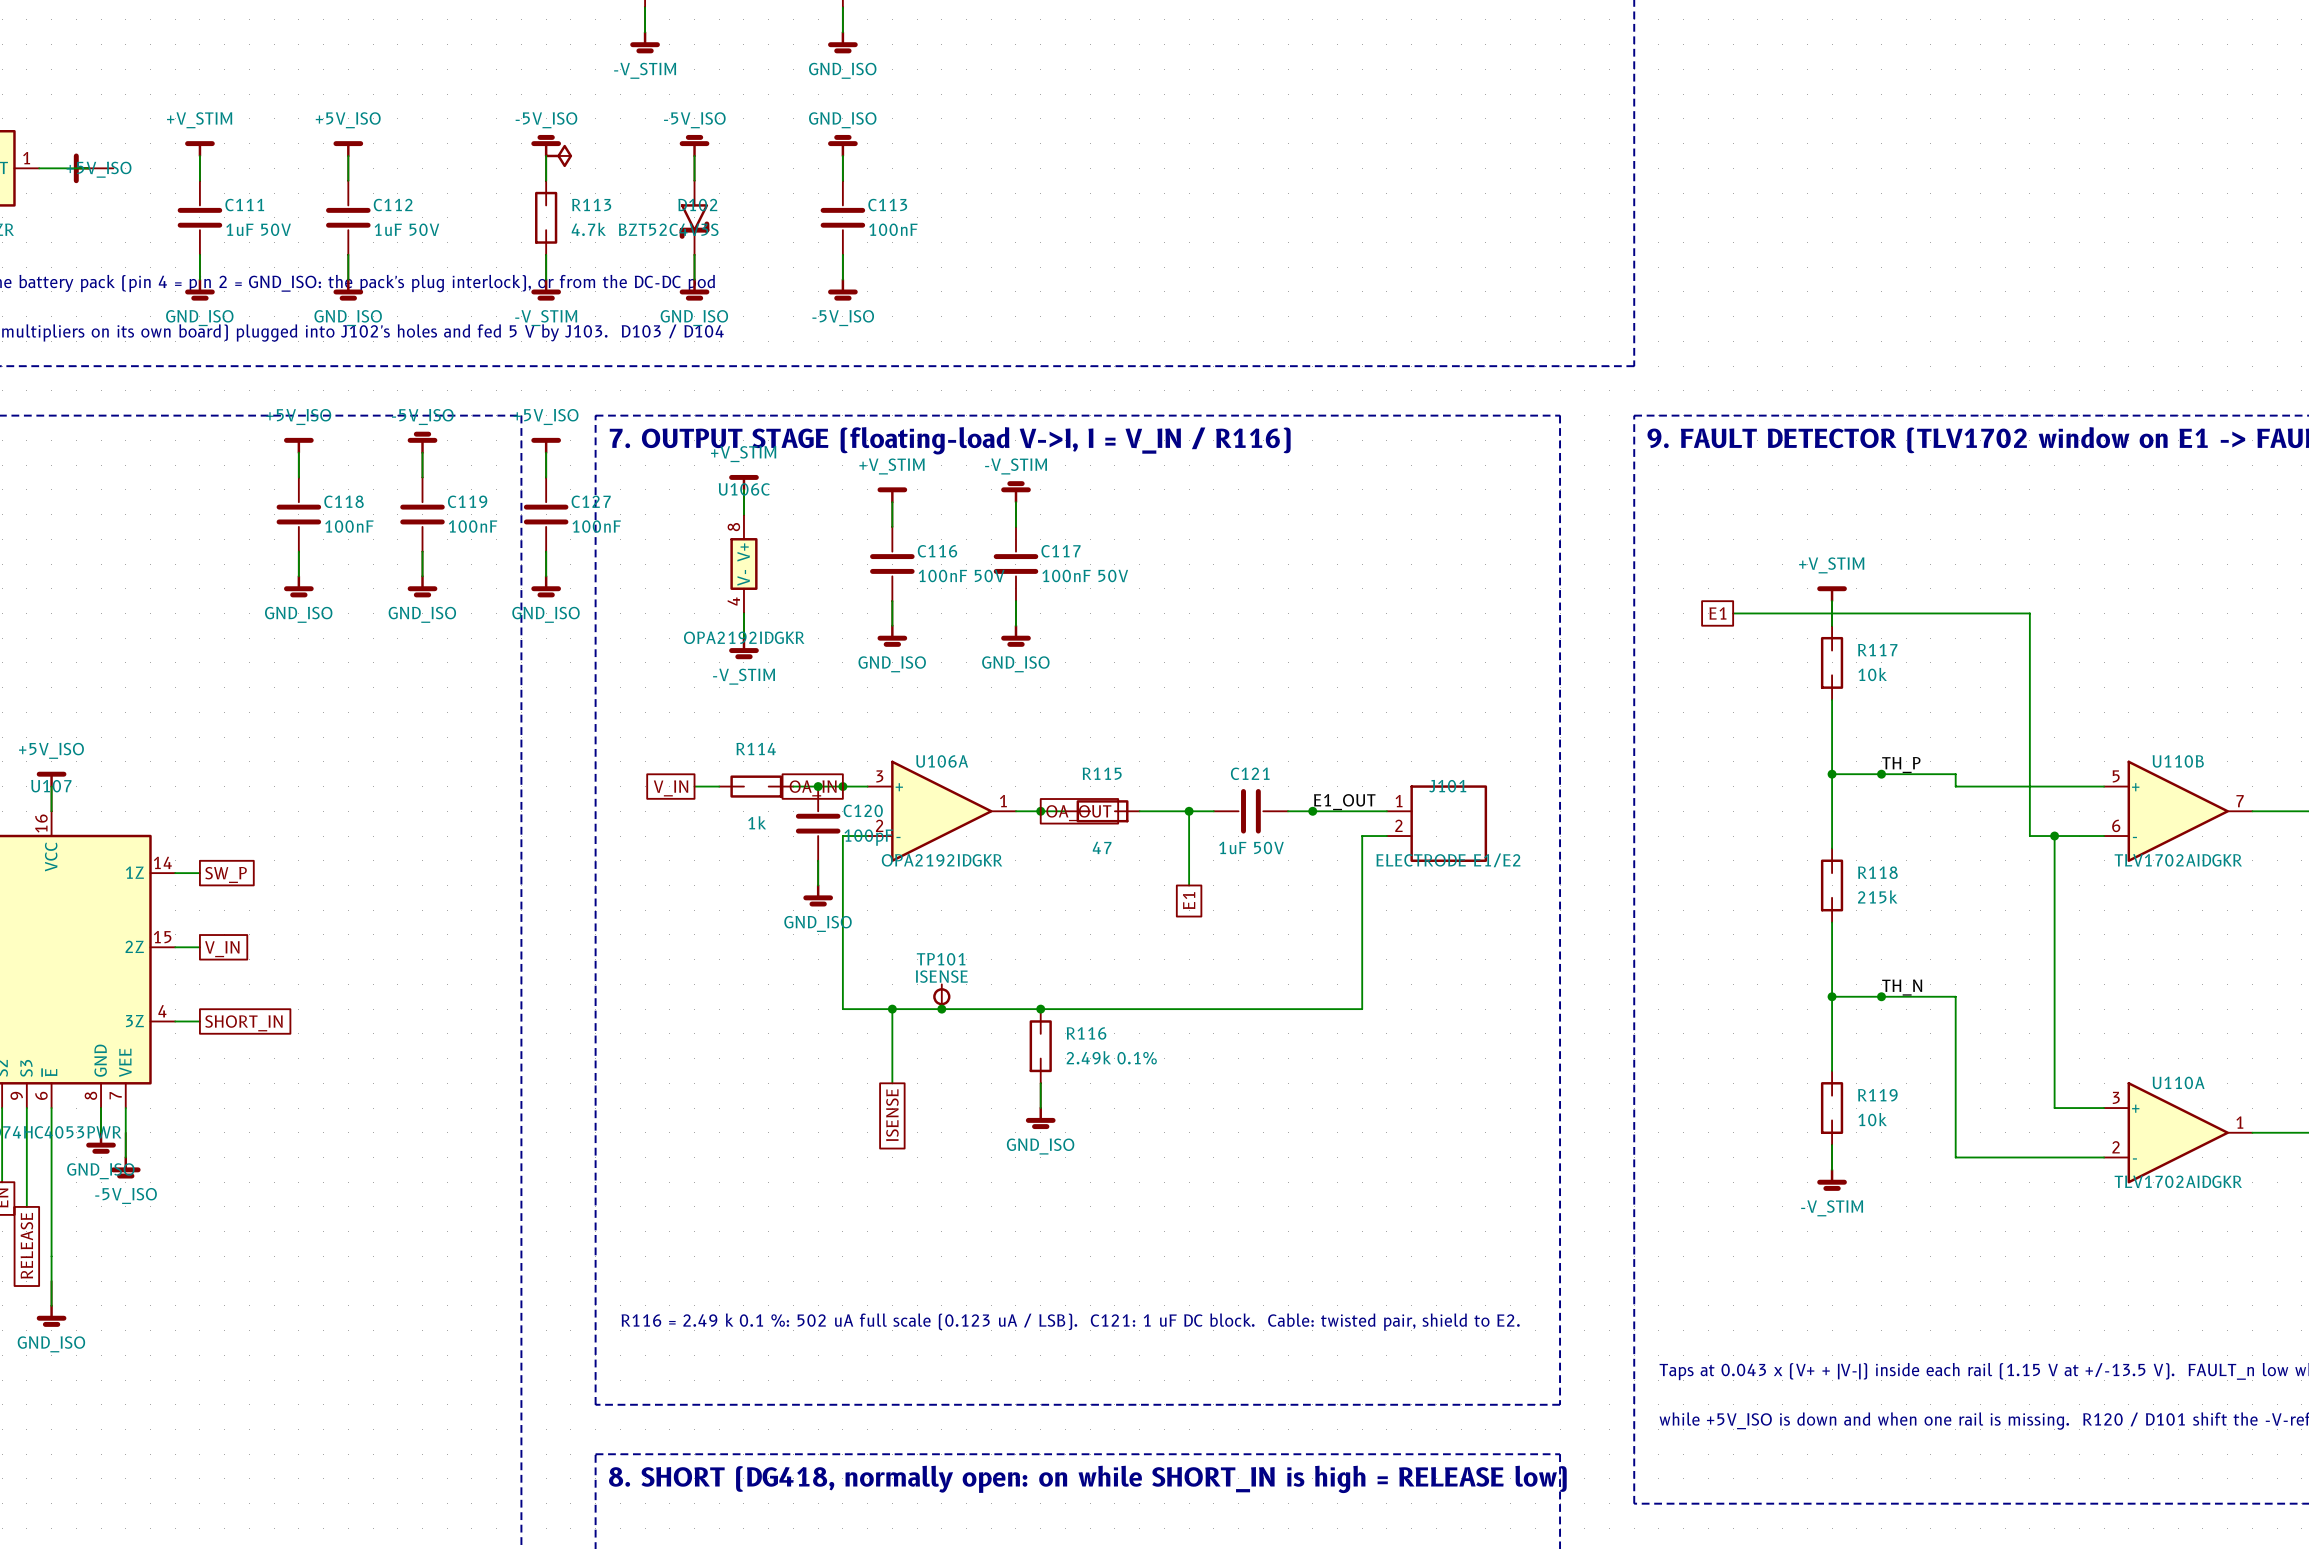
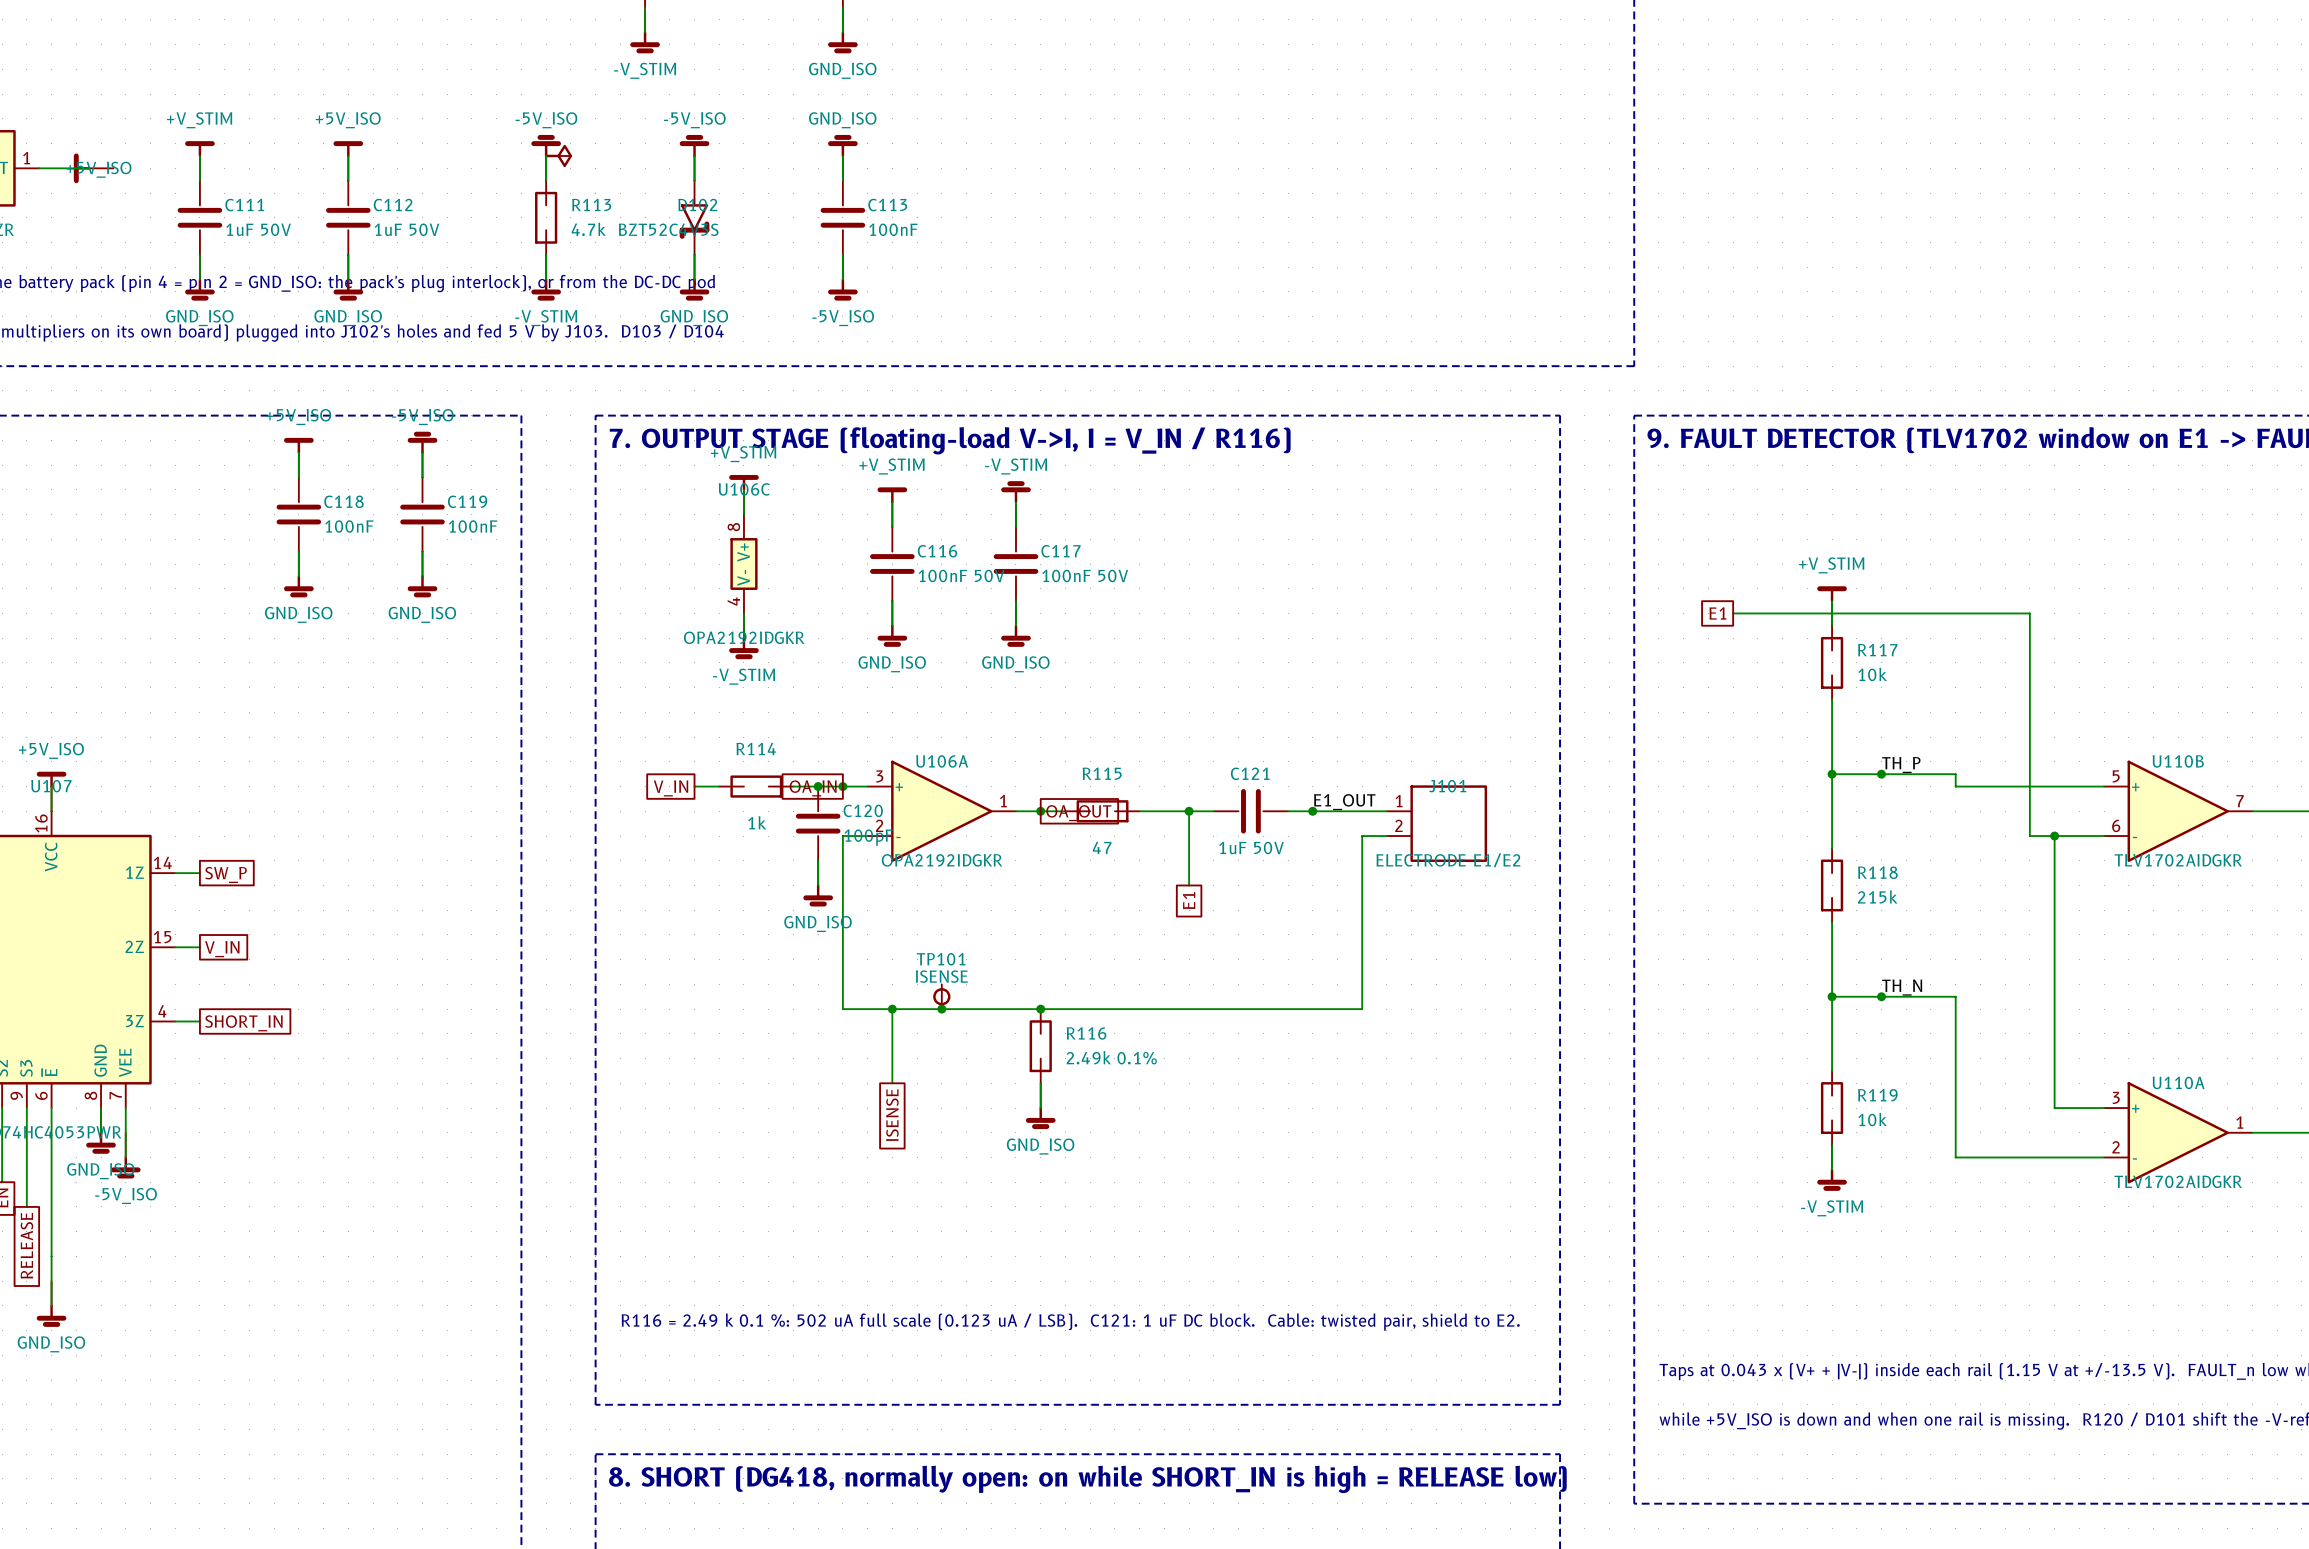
wire: (546, 452) (546, 477) -> none
power symbol: +5V_ISO (546, 457) -> none
C127: 100nF (546, 514) -> none
wire: (546, 551) (546, 576) -> none
power symbol: GND_ISO (546, 574) -> none

